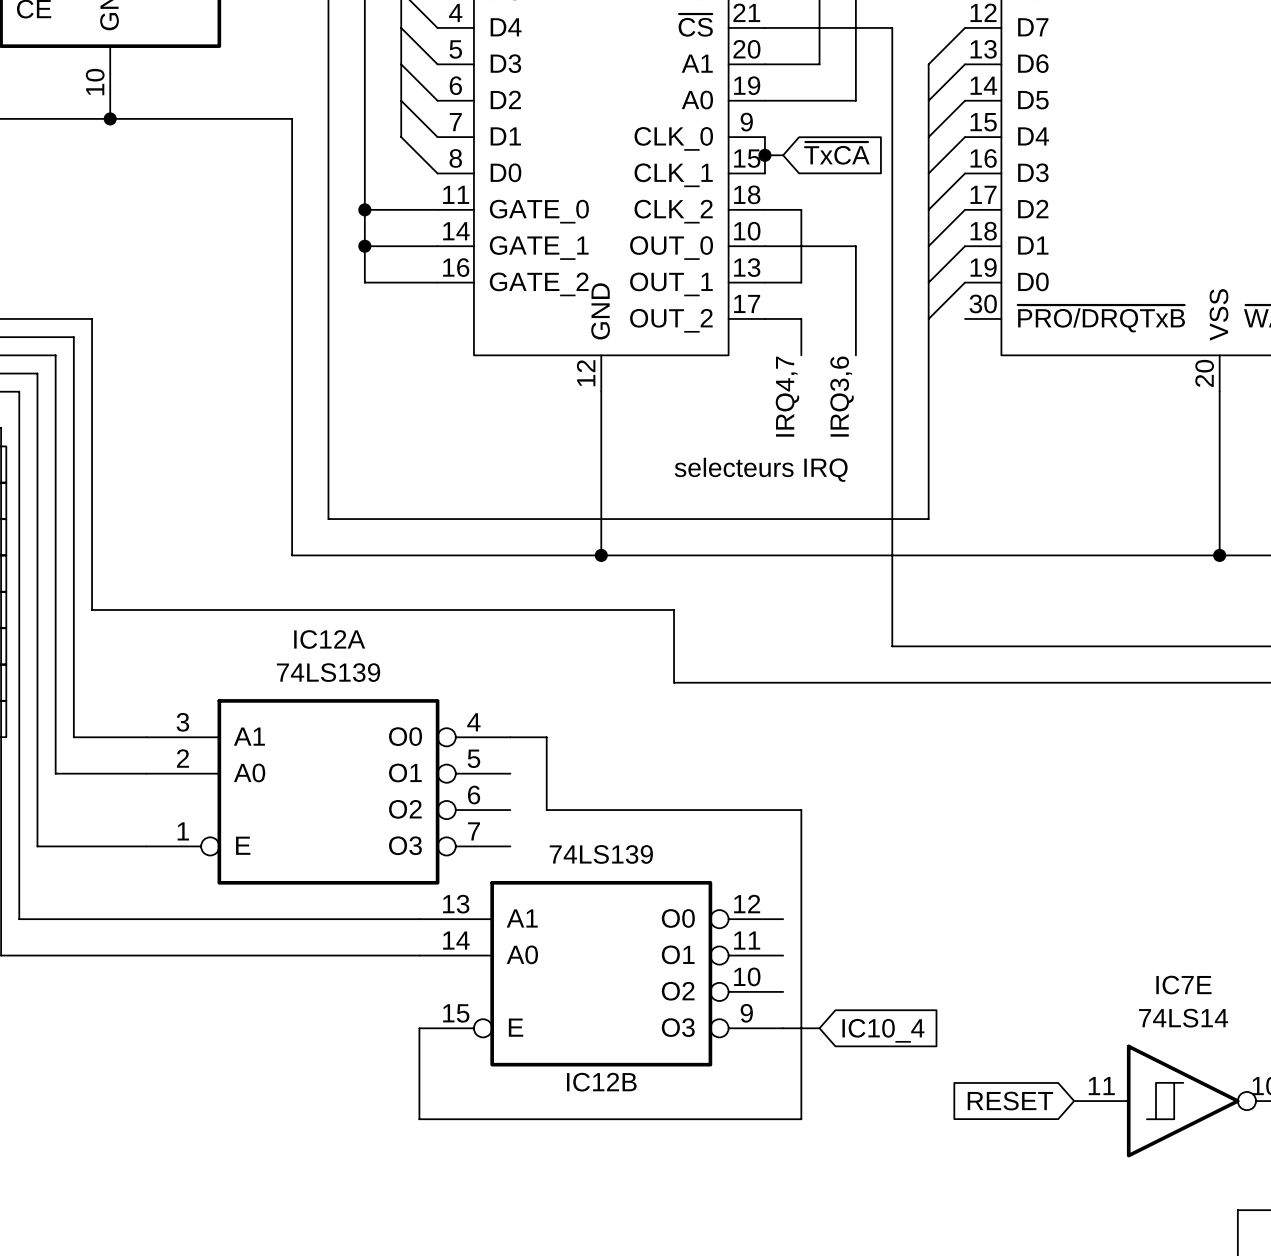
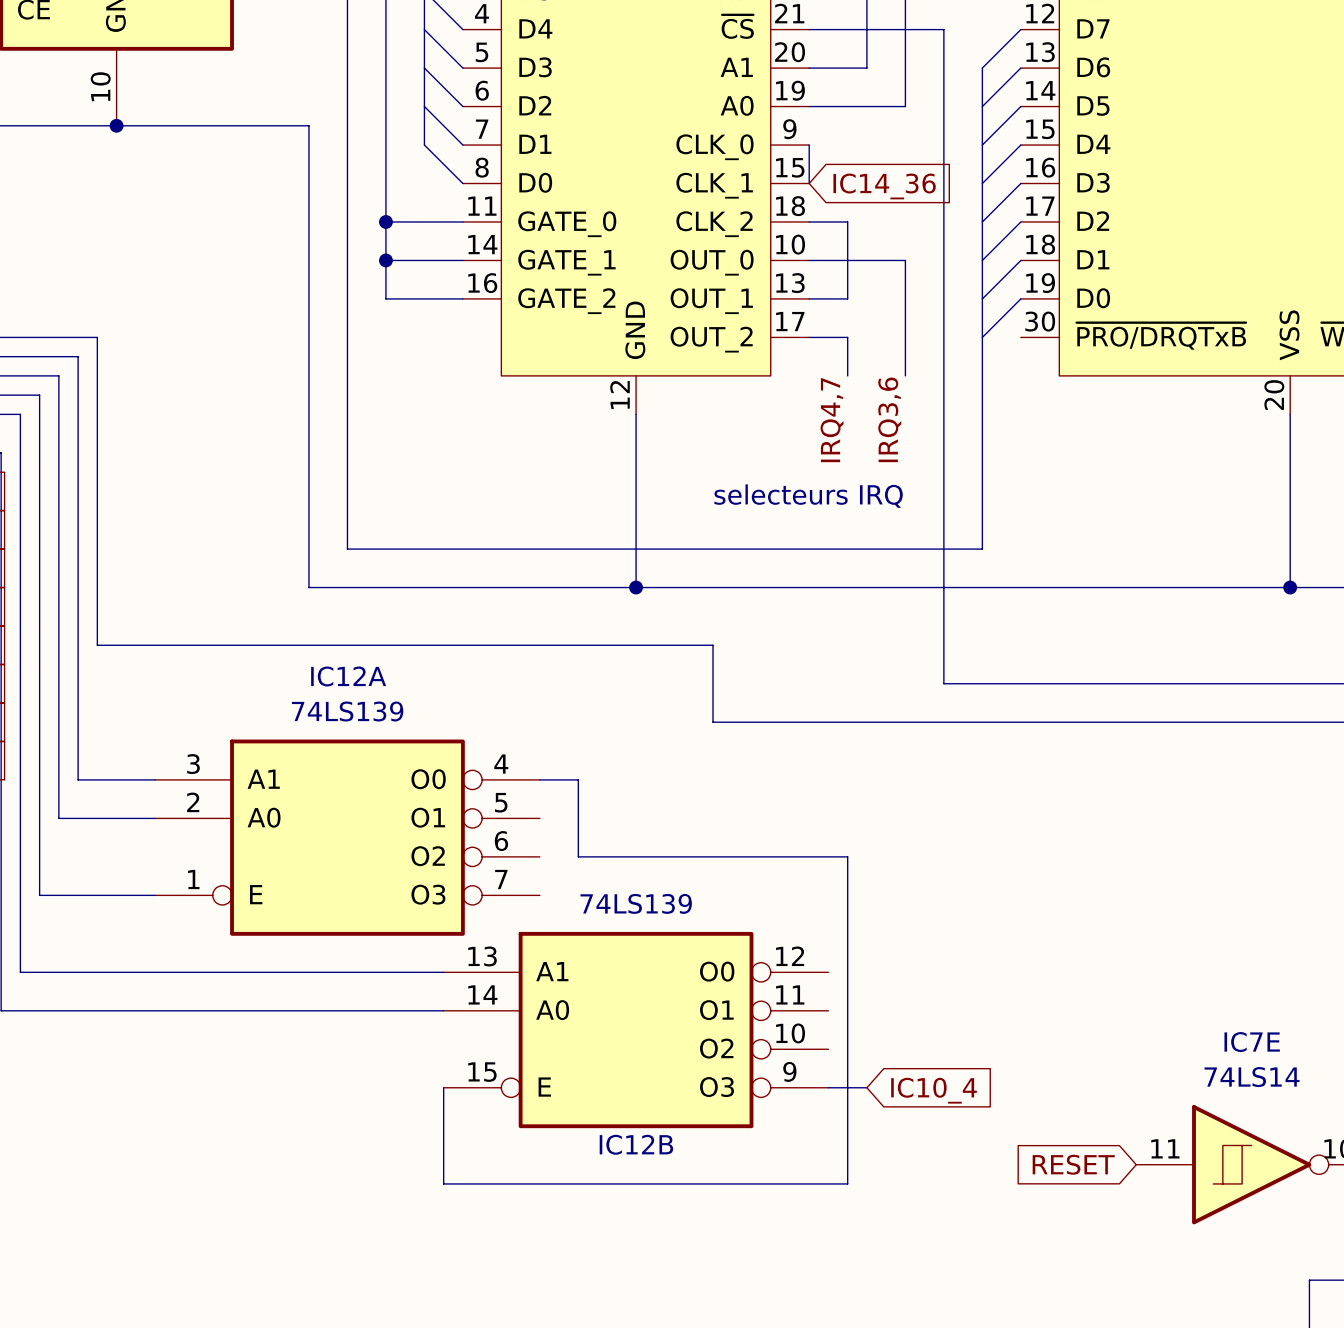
global label: ~{TxCA} (836, 153) -> none
wire: (764, 155) (783, 155) -> none
junction: (764, 155) -> none
global label: none -> IC14_36 (884, 186)

